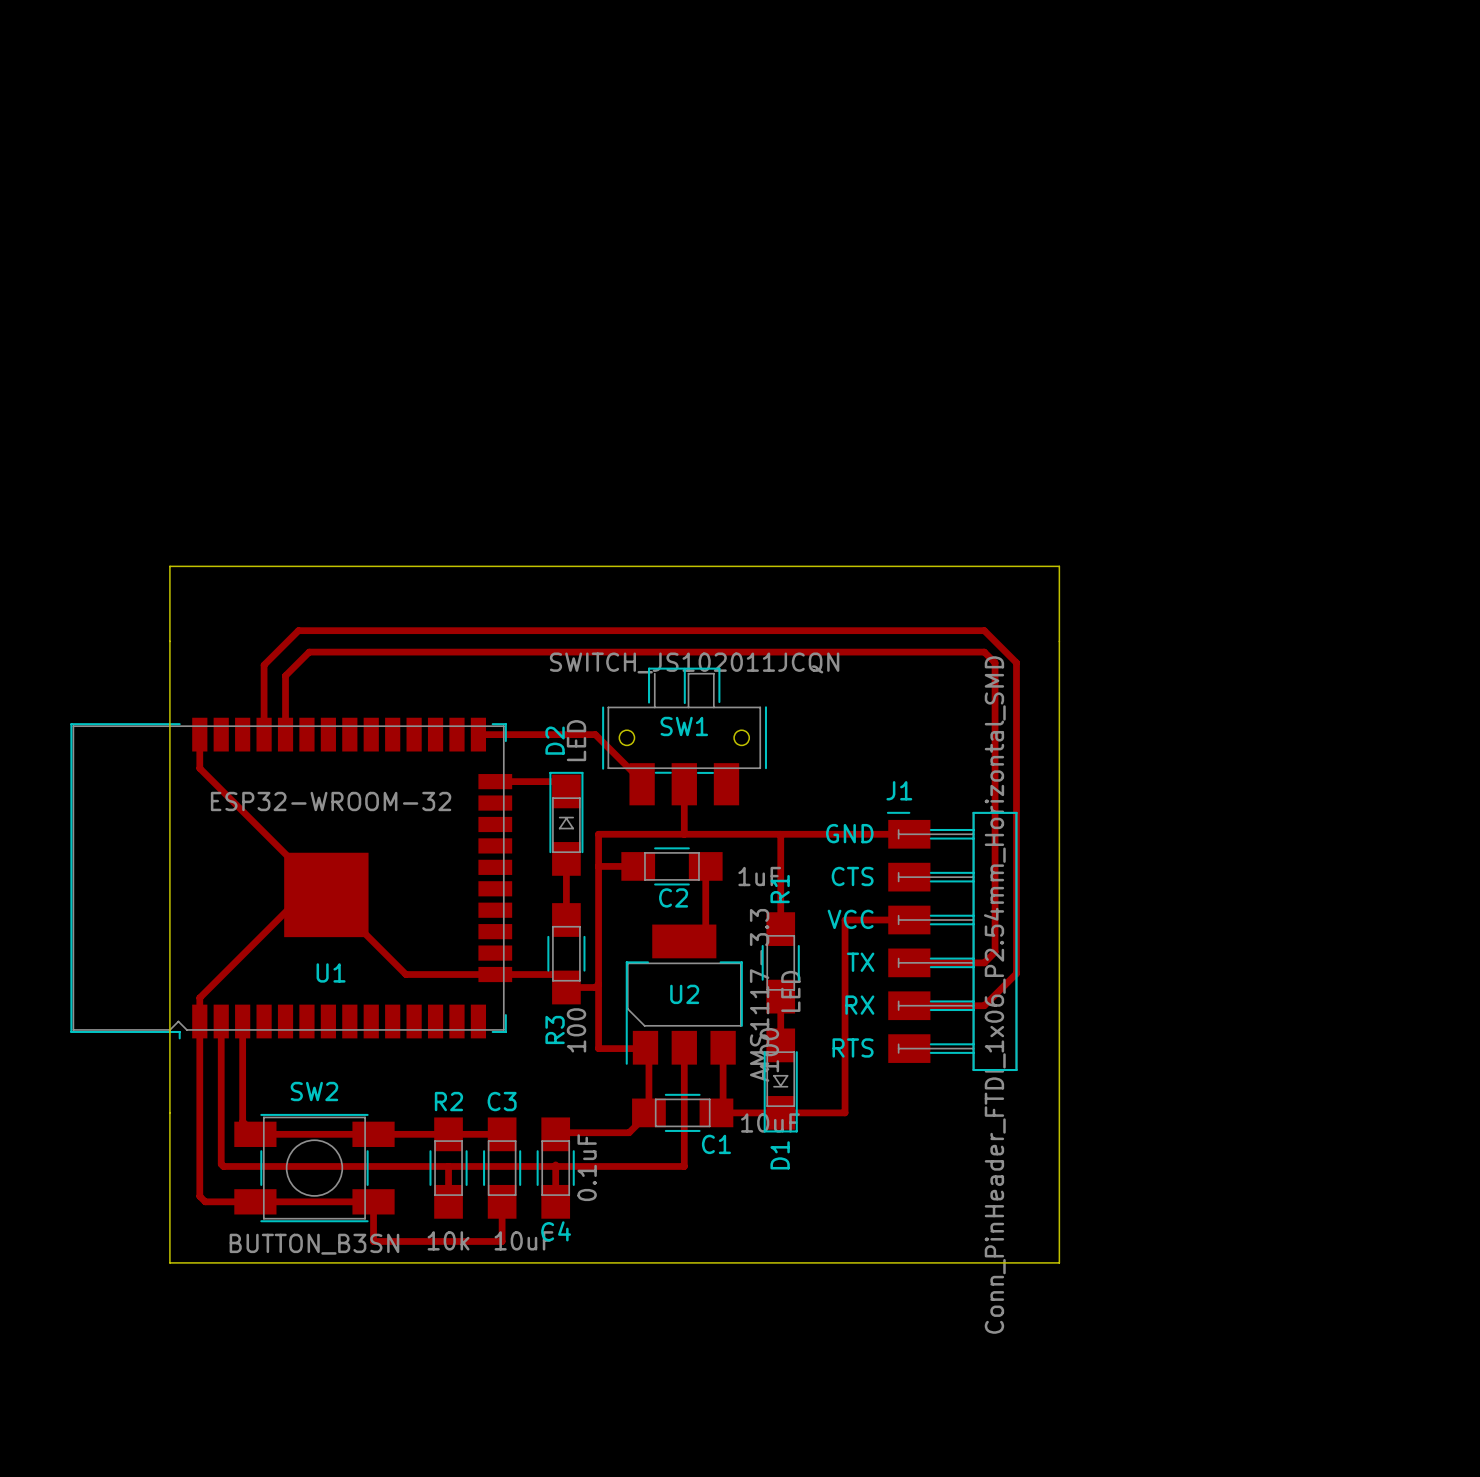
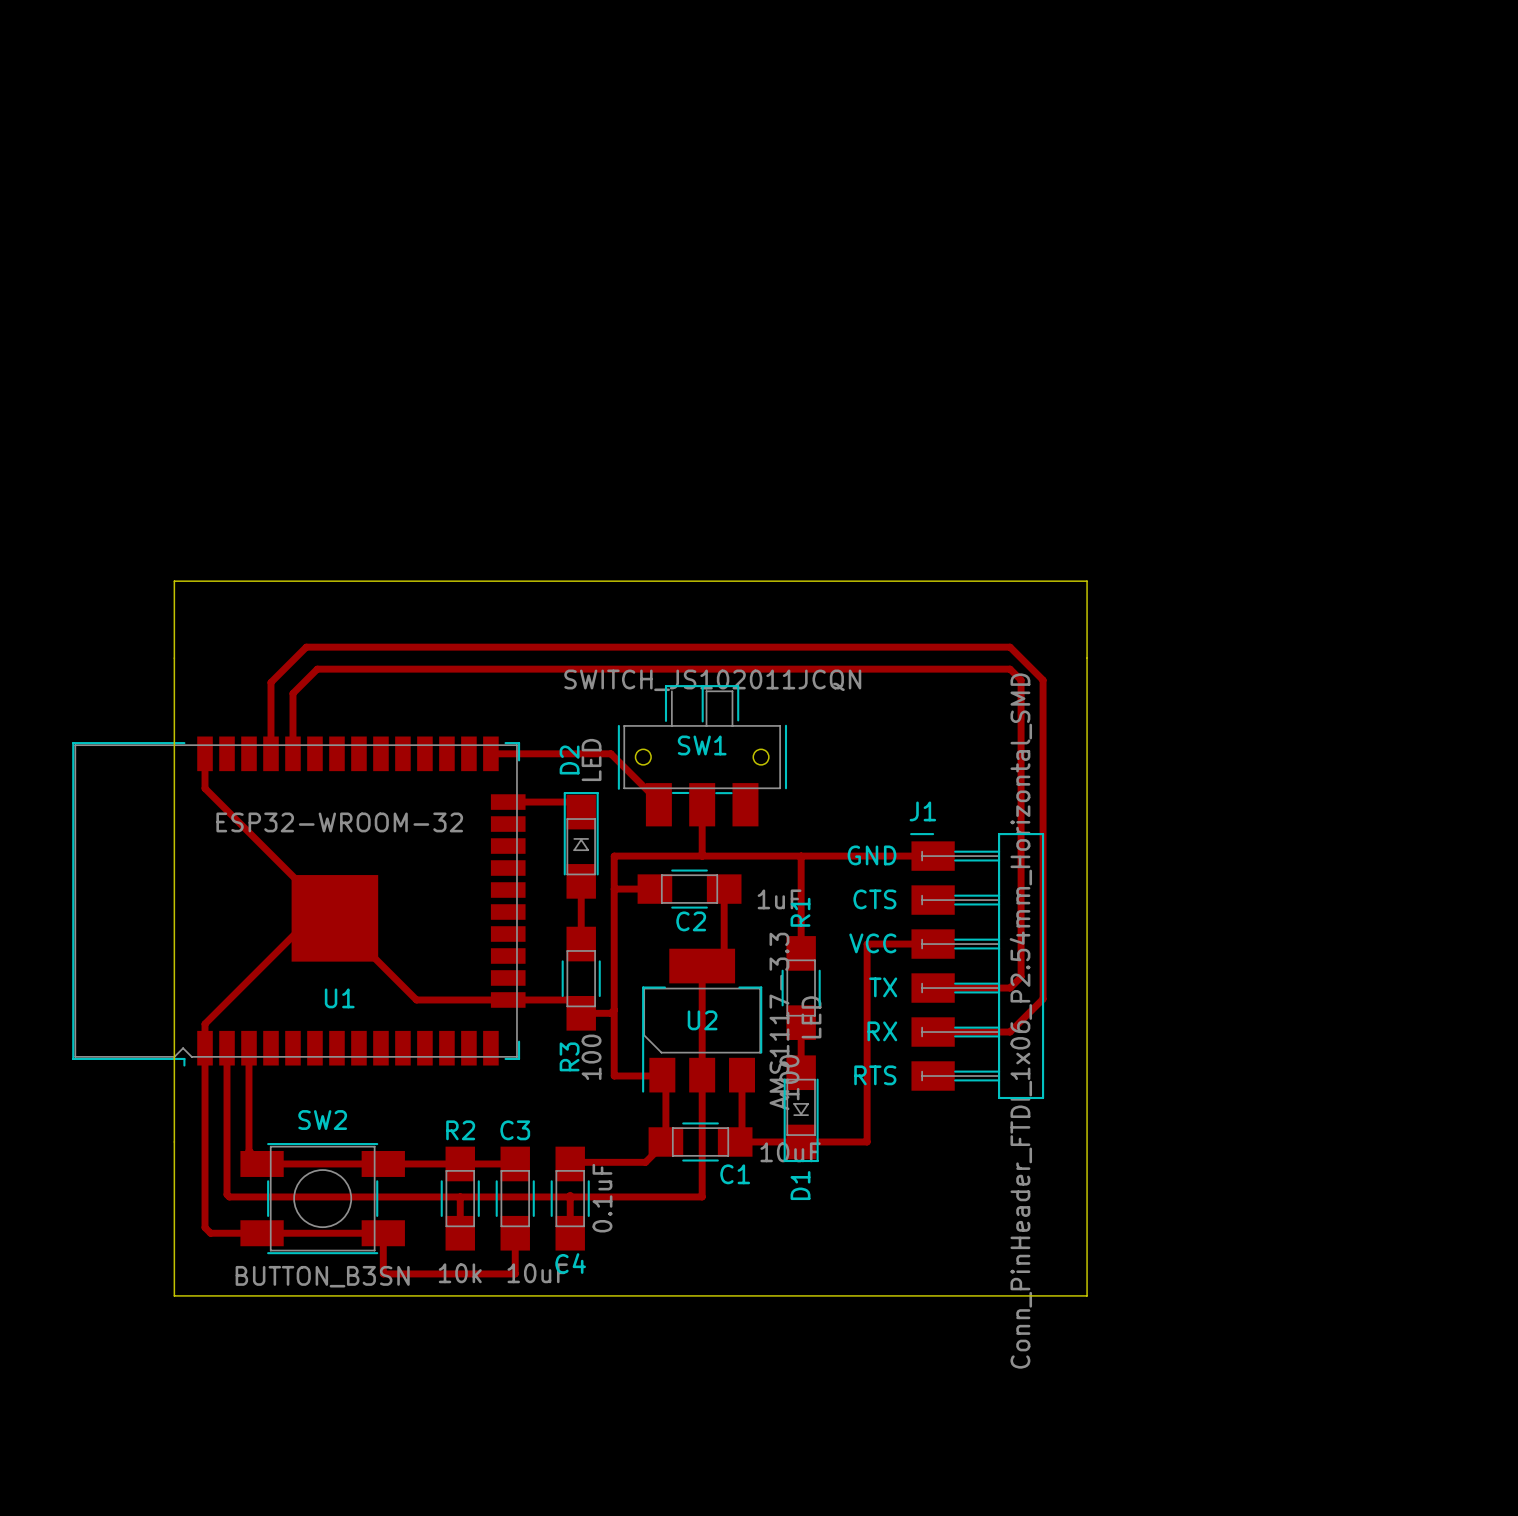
top track: none -> (702, 966) (702, 1075)

